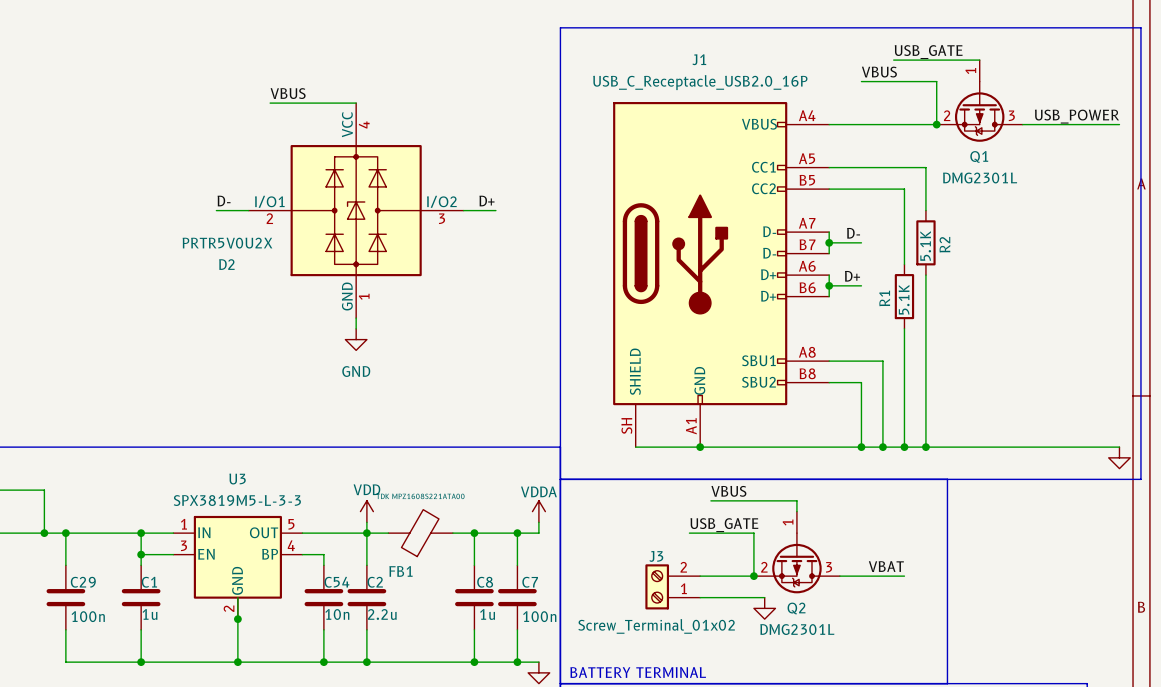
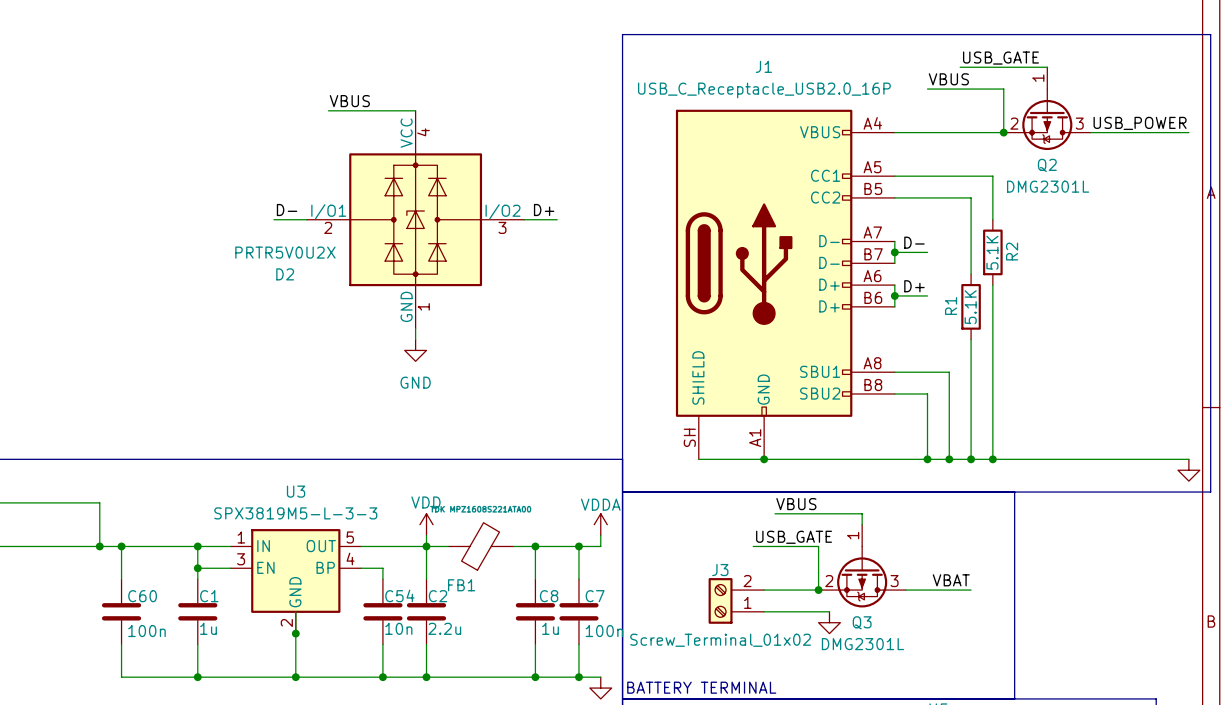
Q1 name: Q1 (979, 156) -> Q2 (1047, 165)
C29 name: C29 (83, 582) -> C60 (142, 596)
Q2 name: Q2 (796, 608) -> Q3 (862, 622)

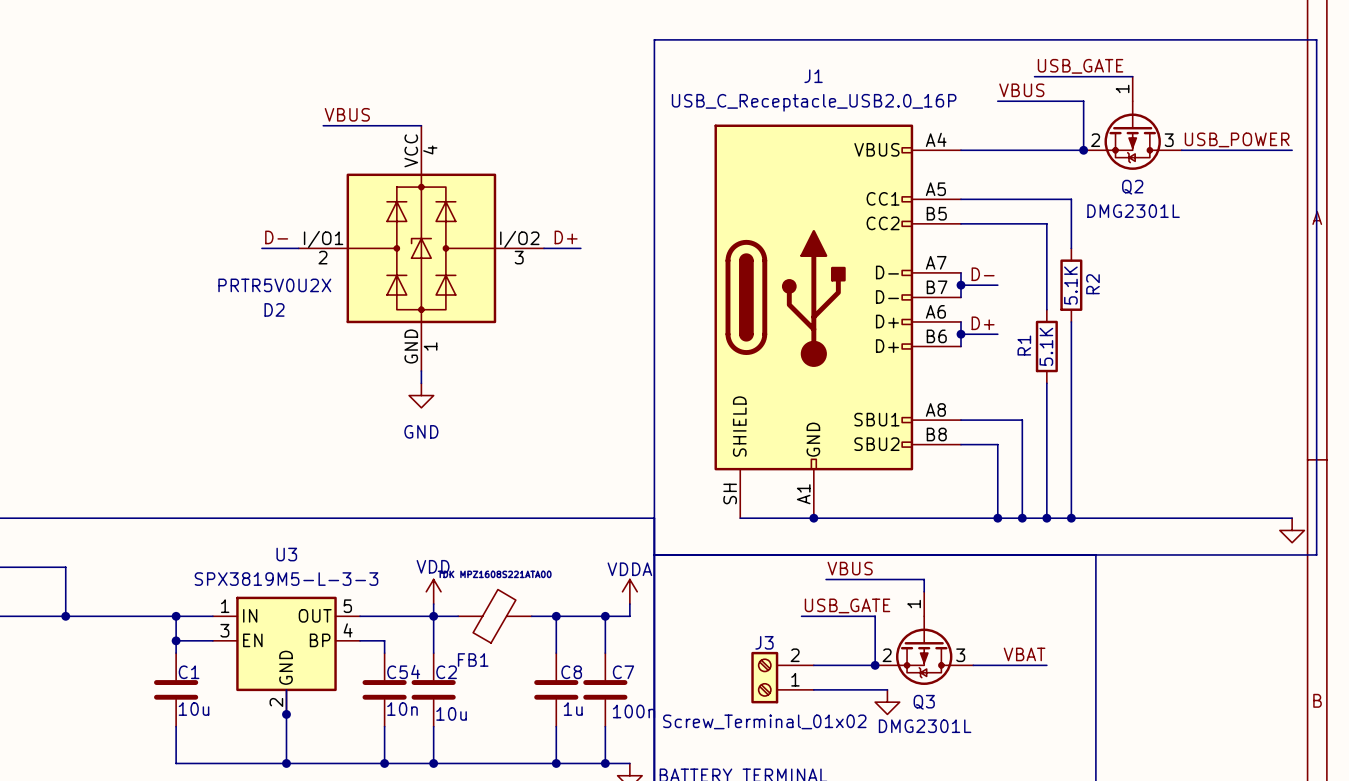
wire: (121, 546) (121, 579) -> none
junction: (121, 546) -> none
C60: 100n (121, 611) -> none
C1 value: 1u (208, 628) -> 10u (194, 709)
C2 value: 2.2u (444, 628) -> 10u (451, 713)
wire: (121, 644) (121, 677) (197, 677) -> none
junction: (197, 677) -> none

